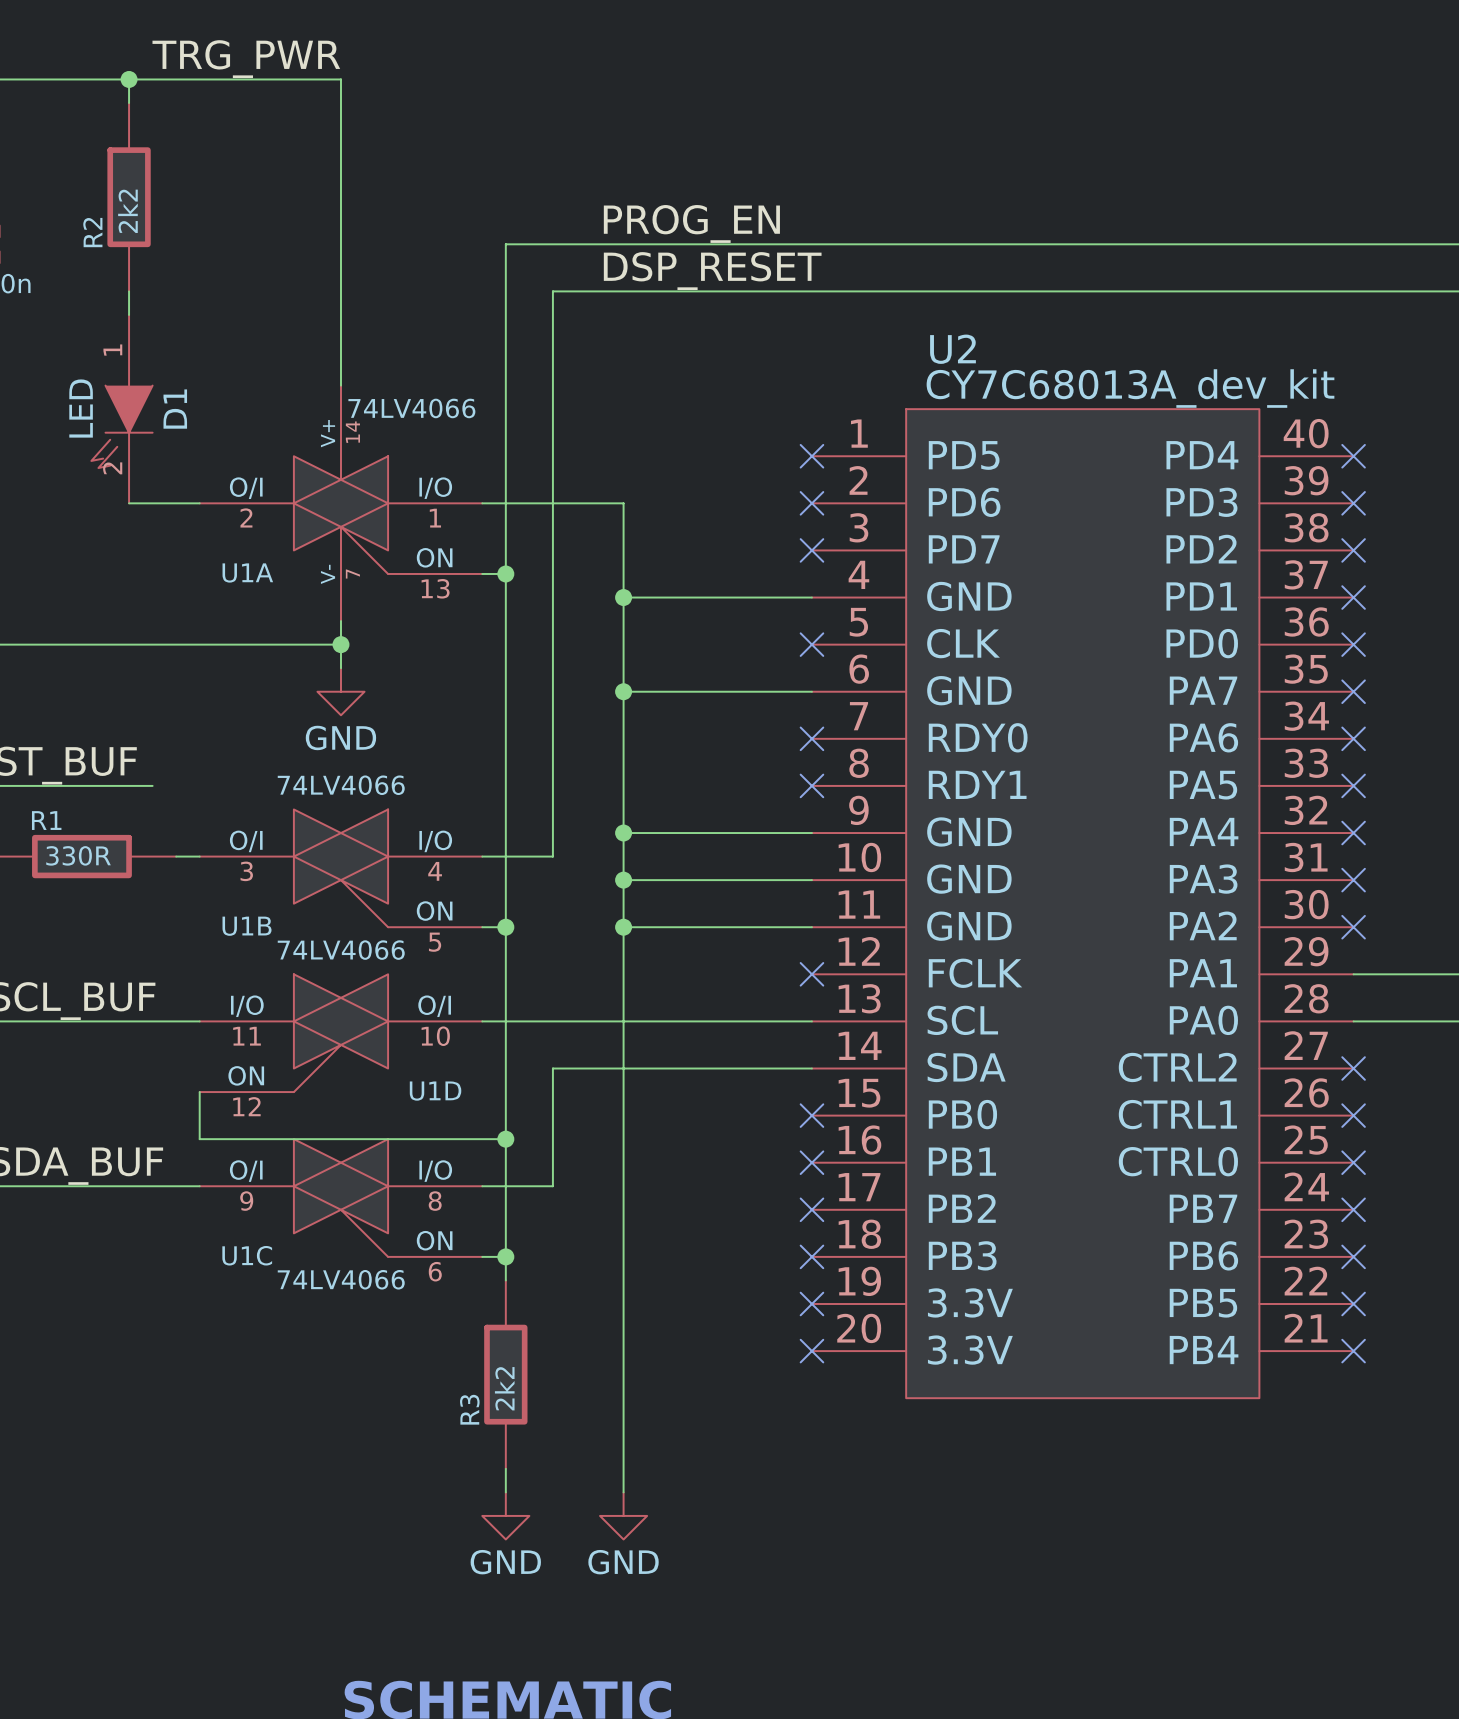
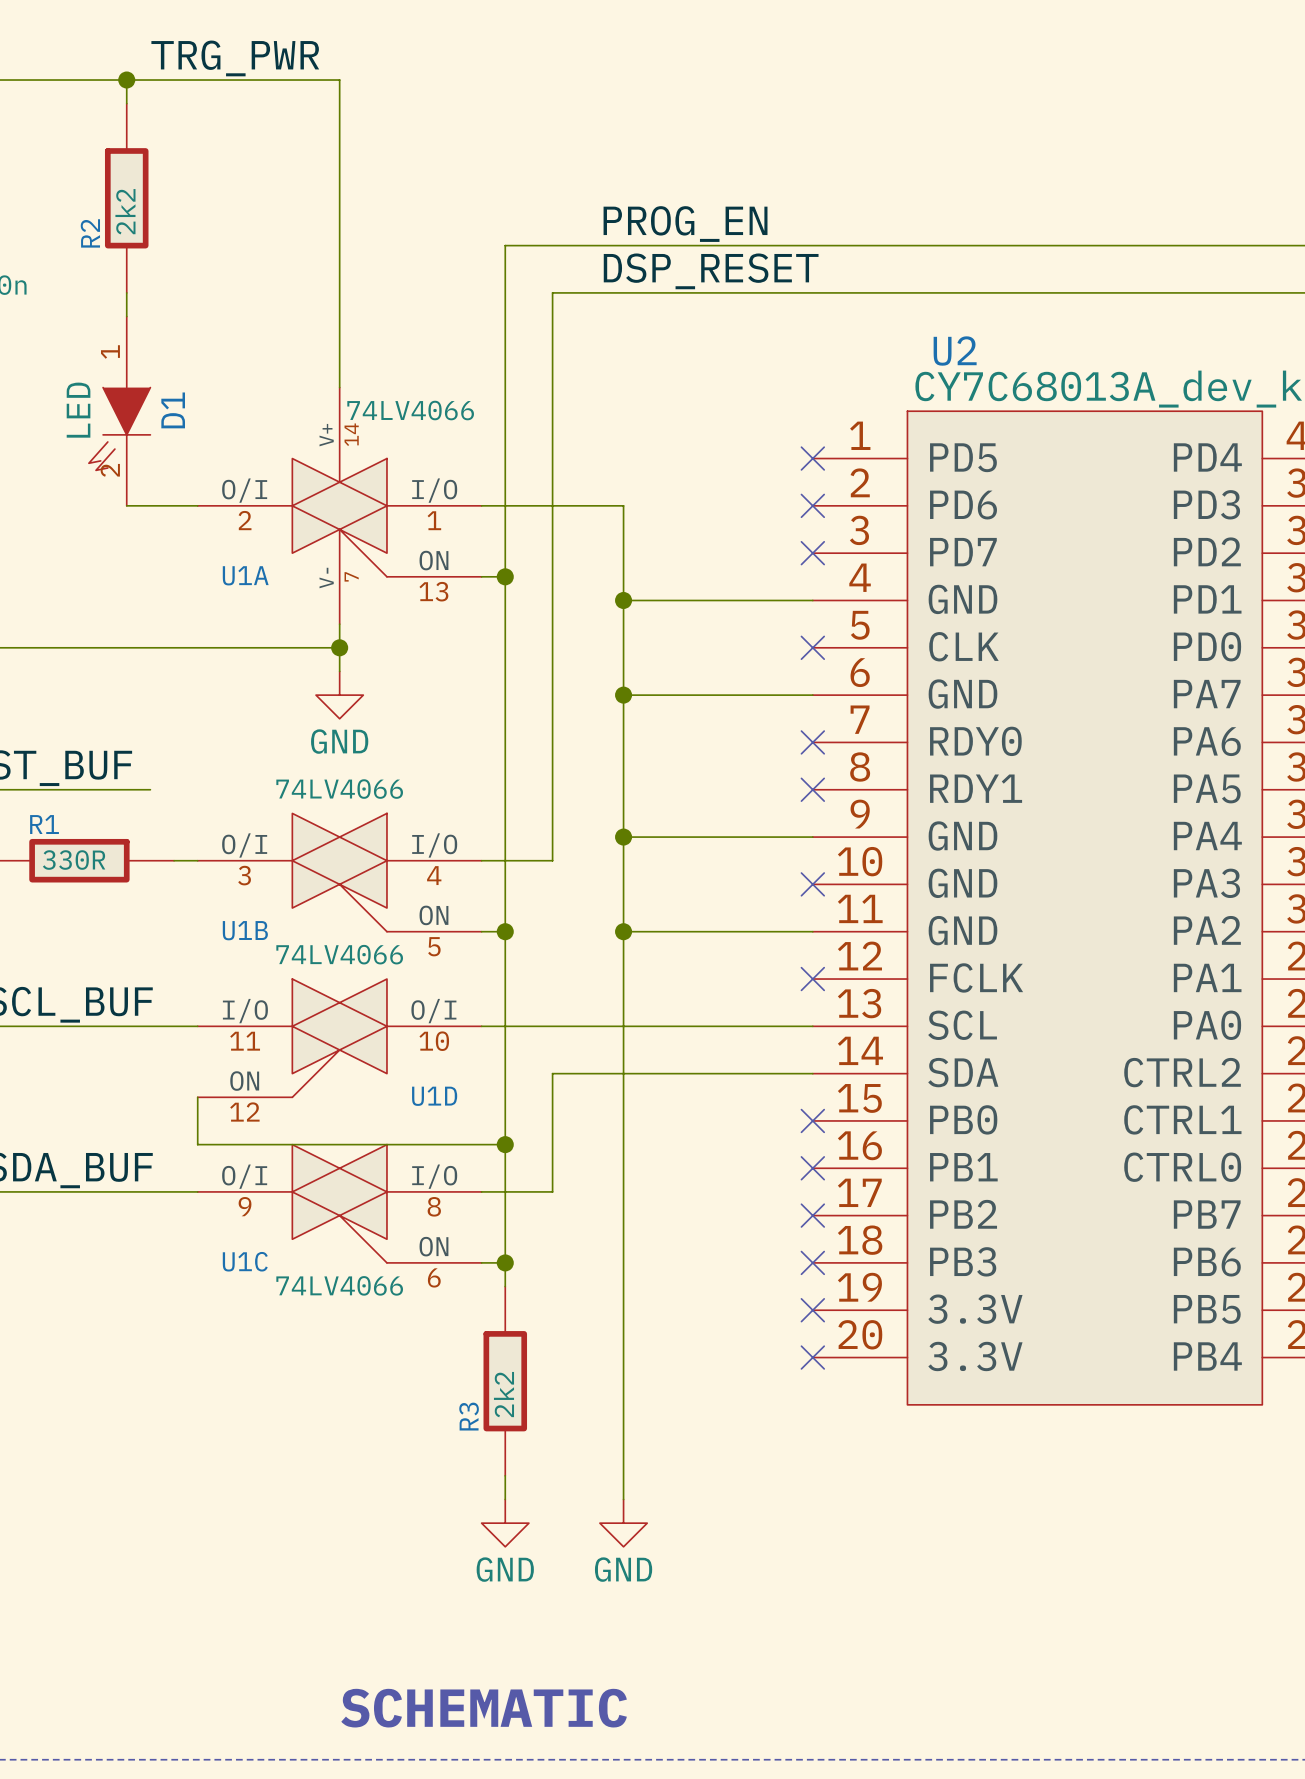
wire: (623, 880) (811, 880) -> none
junction: (623, 880) -> none
no-connect mark: none -> (812, 884)

